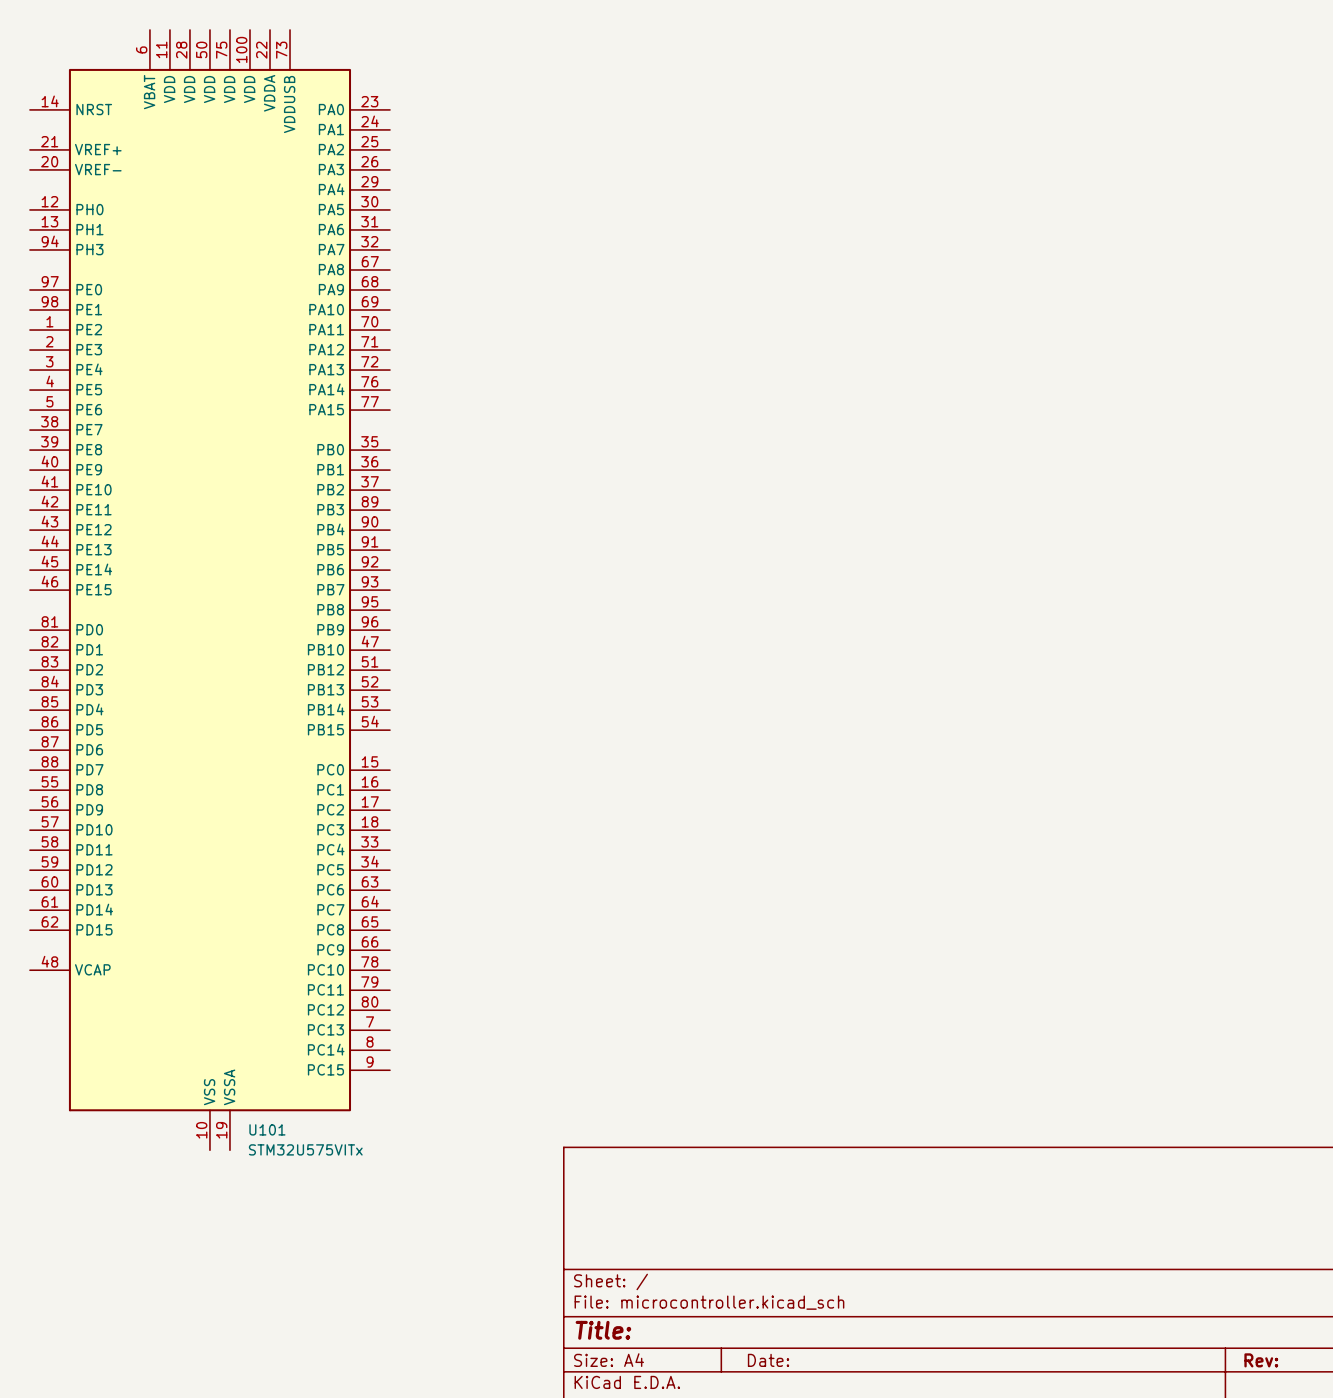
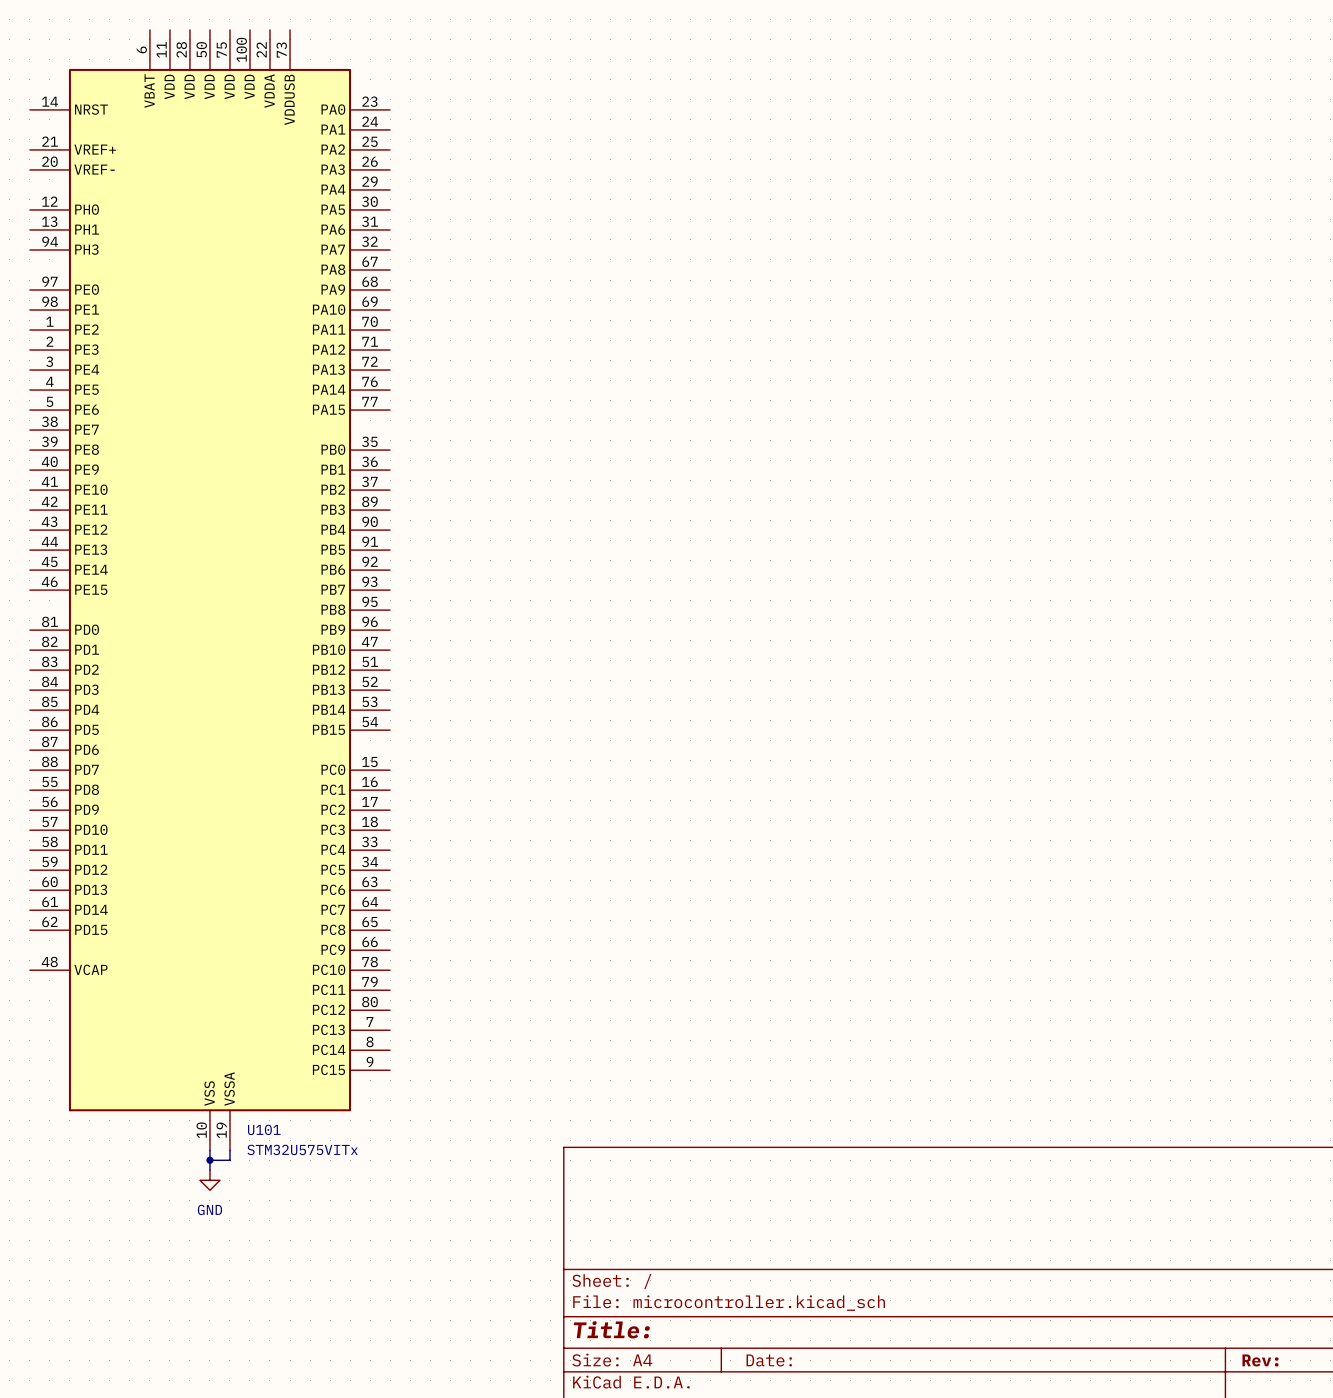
wire: none -> (209, 1150) (209, 1170)
wire: none -> (229, 1150) (229, 1160) (209, 1160)
junction: none -> (209, 1160)
power symbol: none -> GND (209, 1180)

